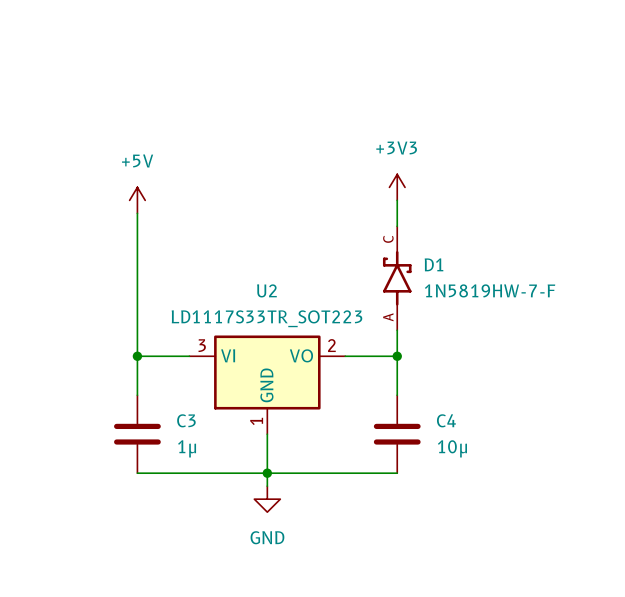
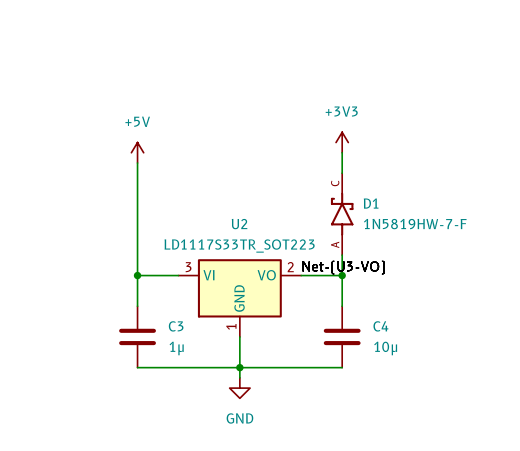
label: none -> Net-(U3-VO) (343, 267)

